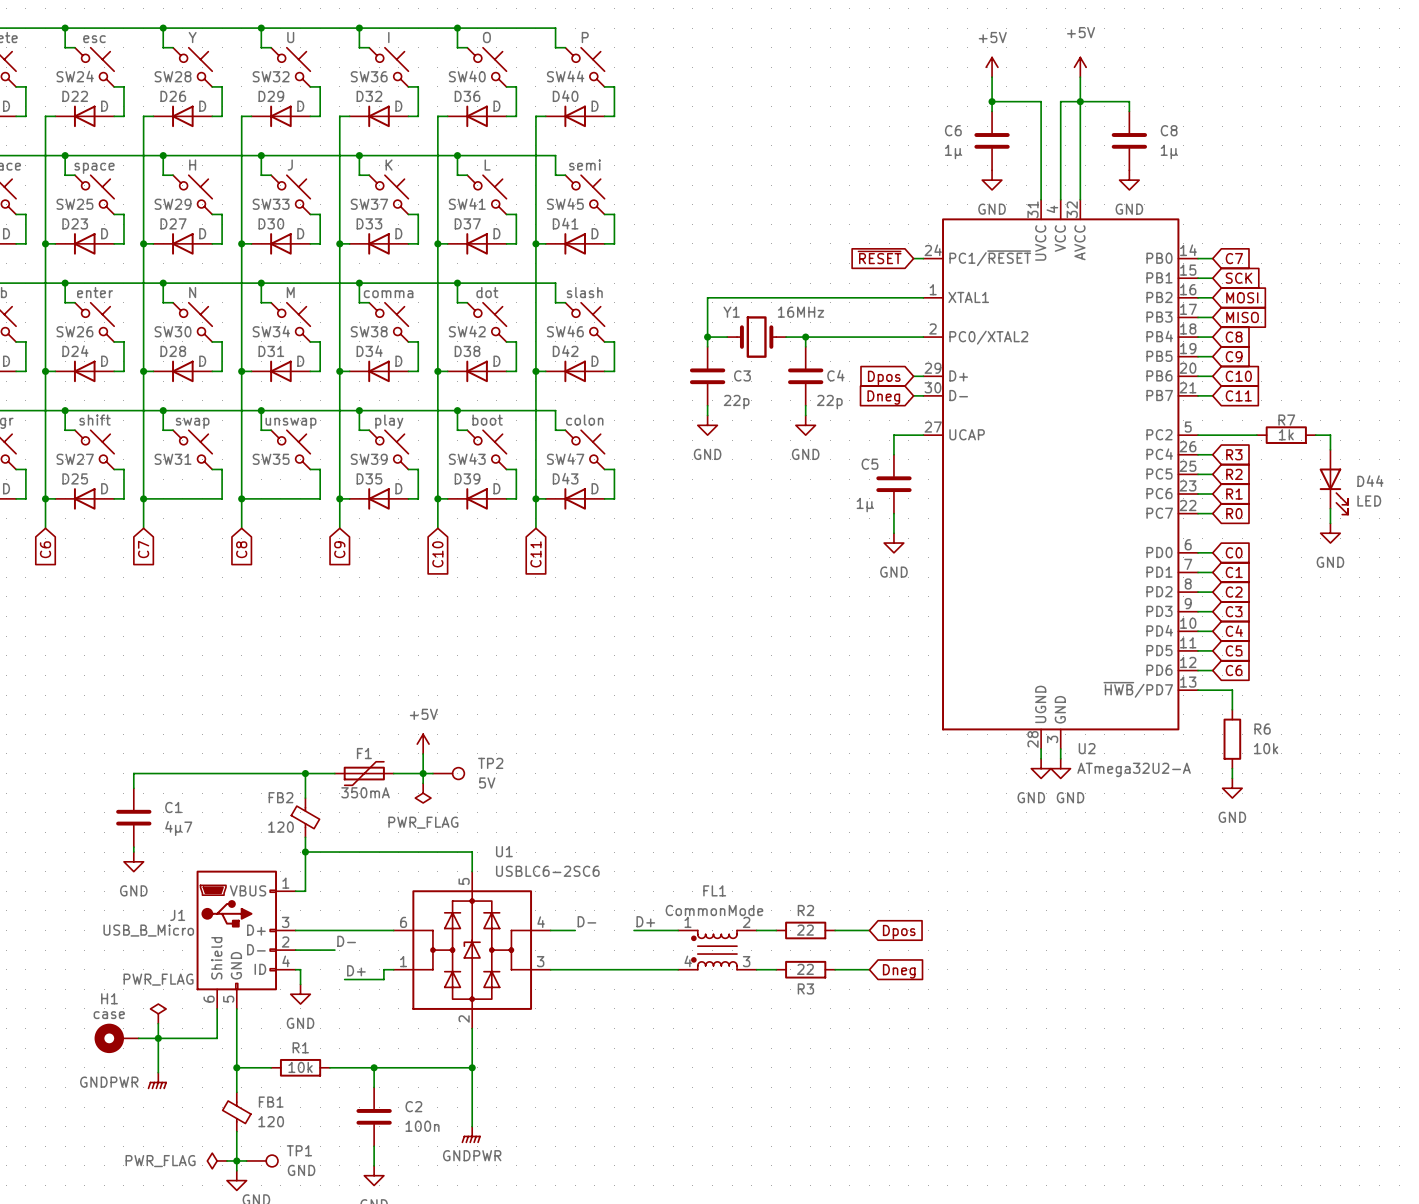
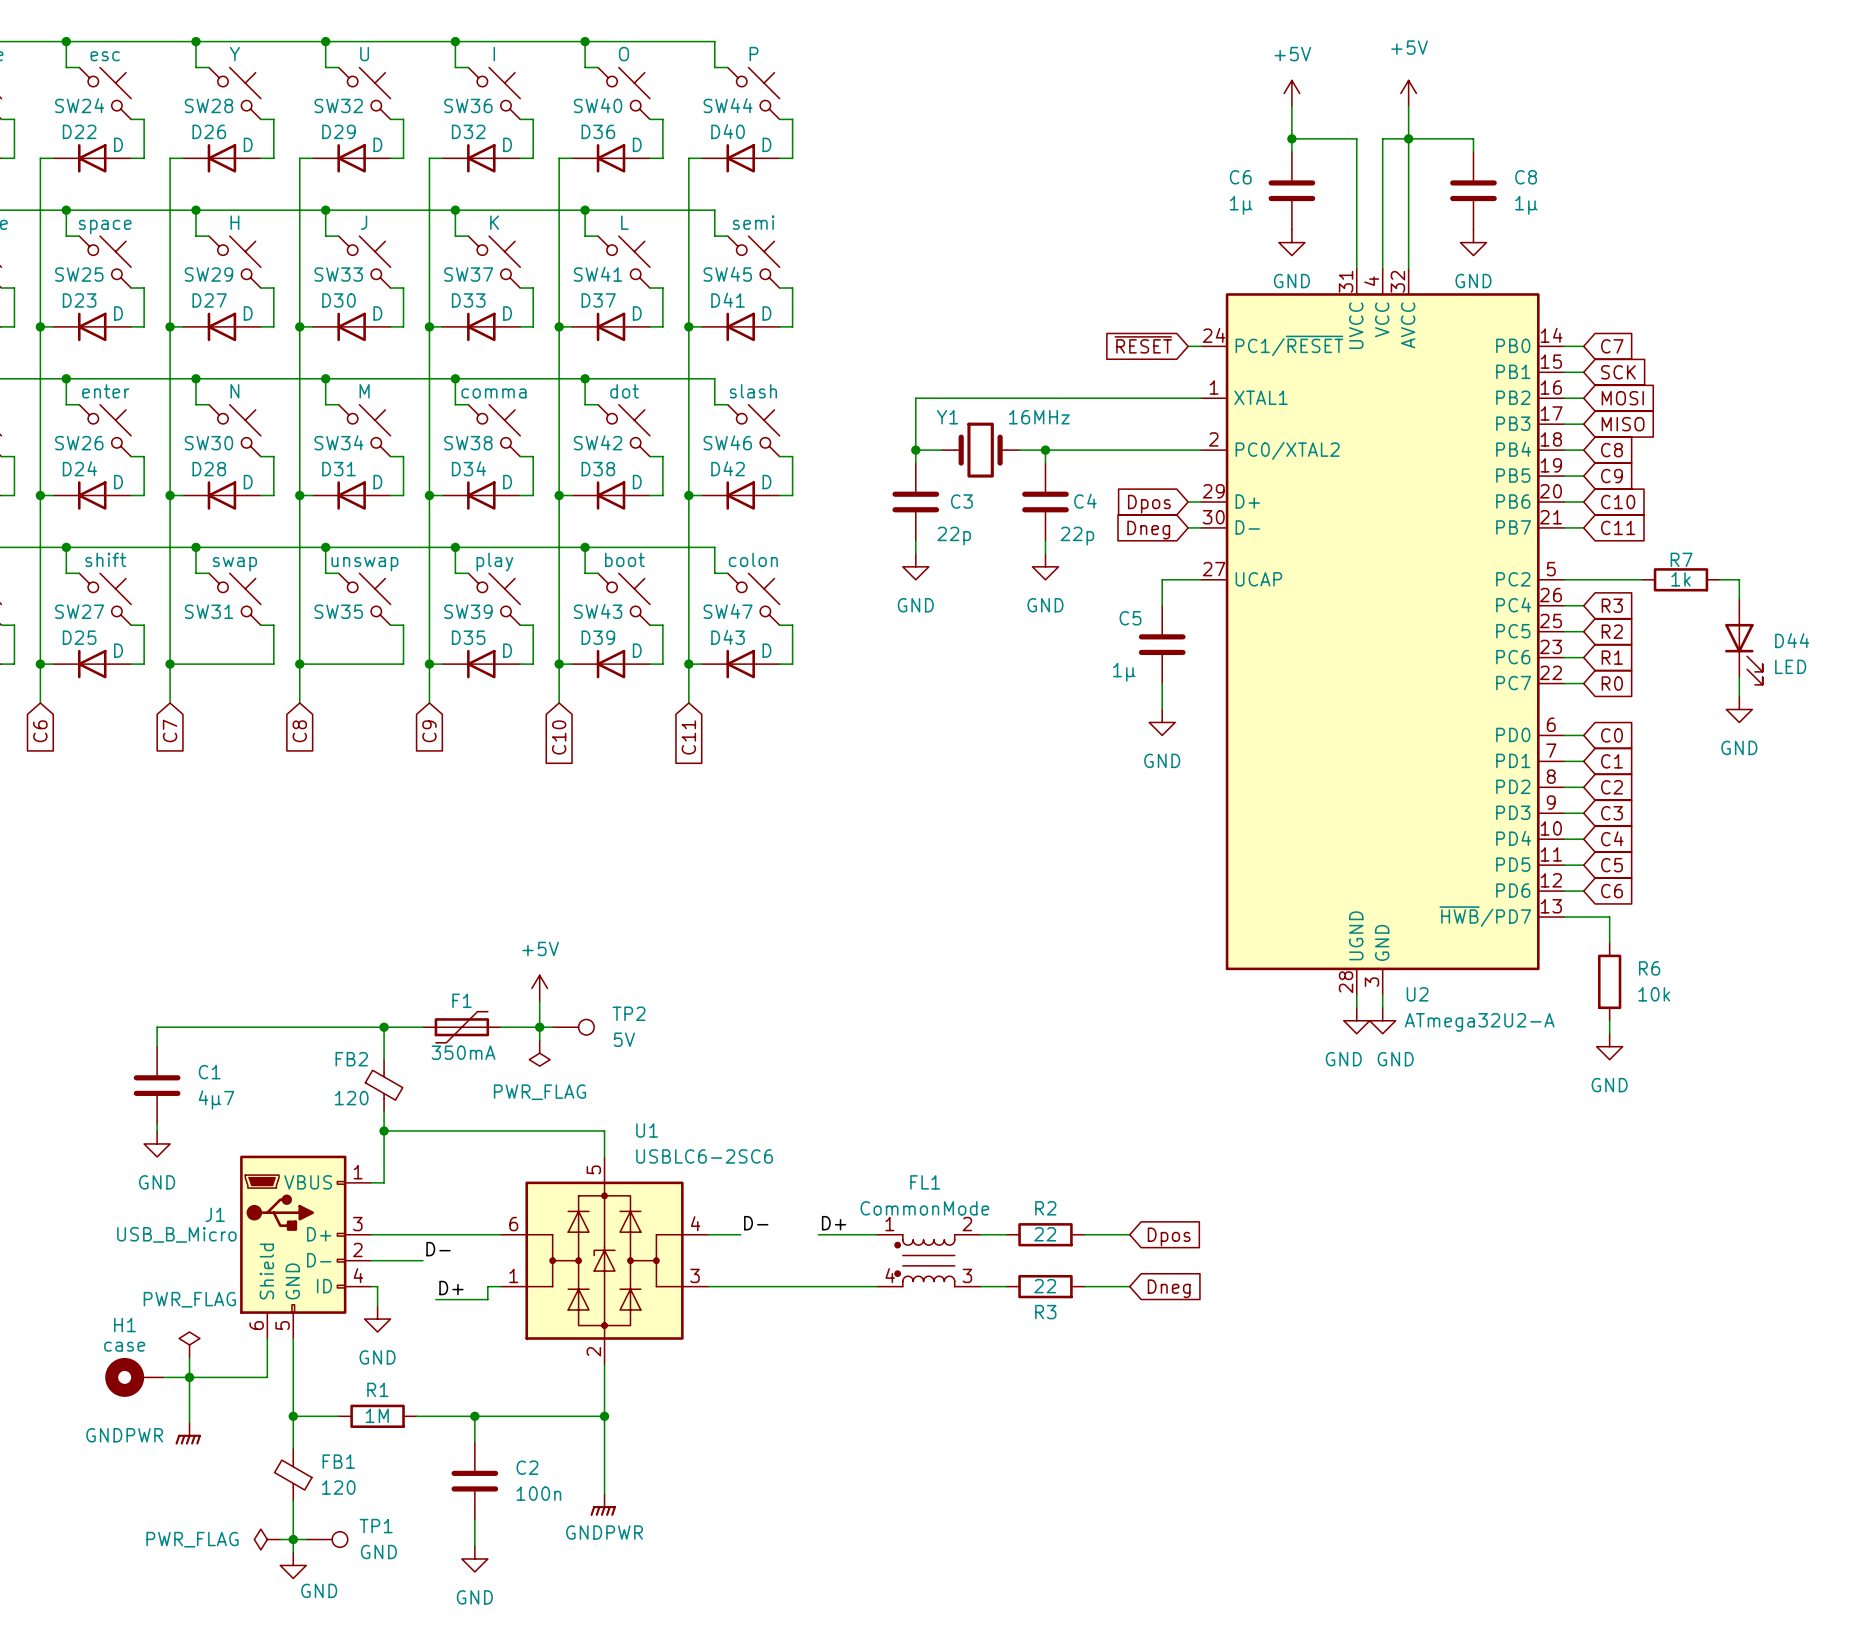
R1 value: 10k (300, 1067) -> 1M (377, 1415)

